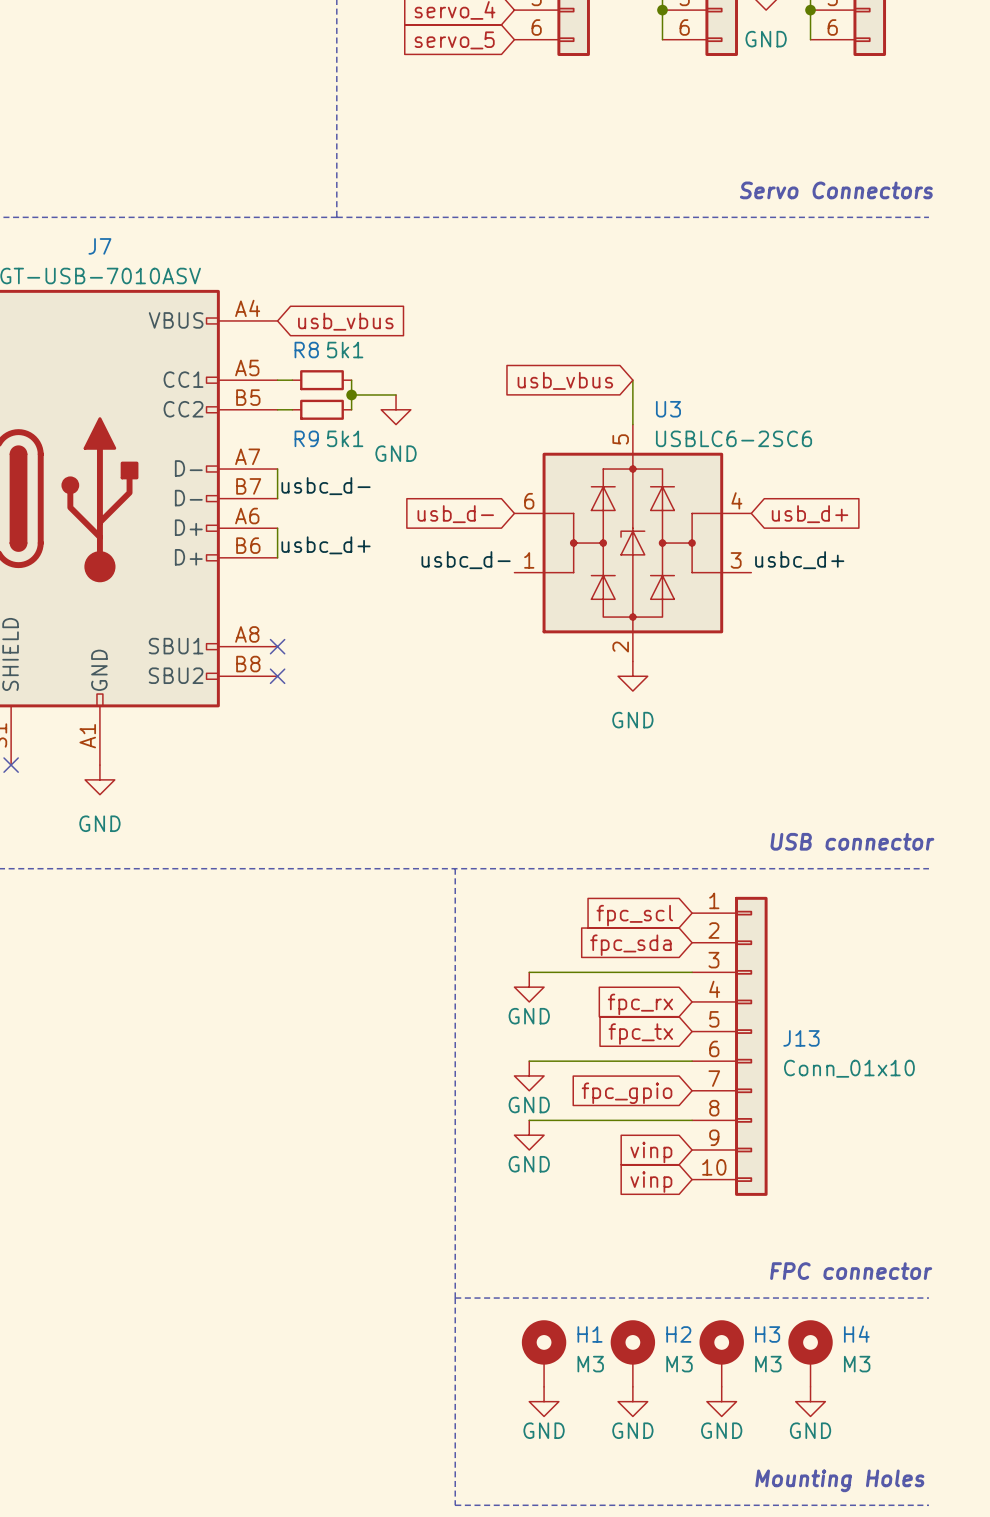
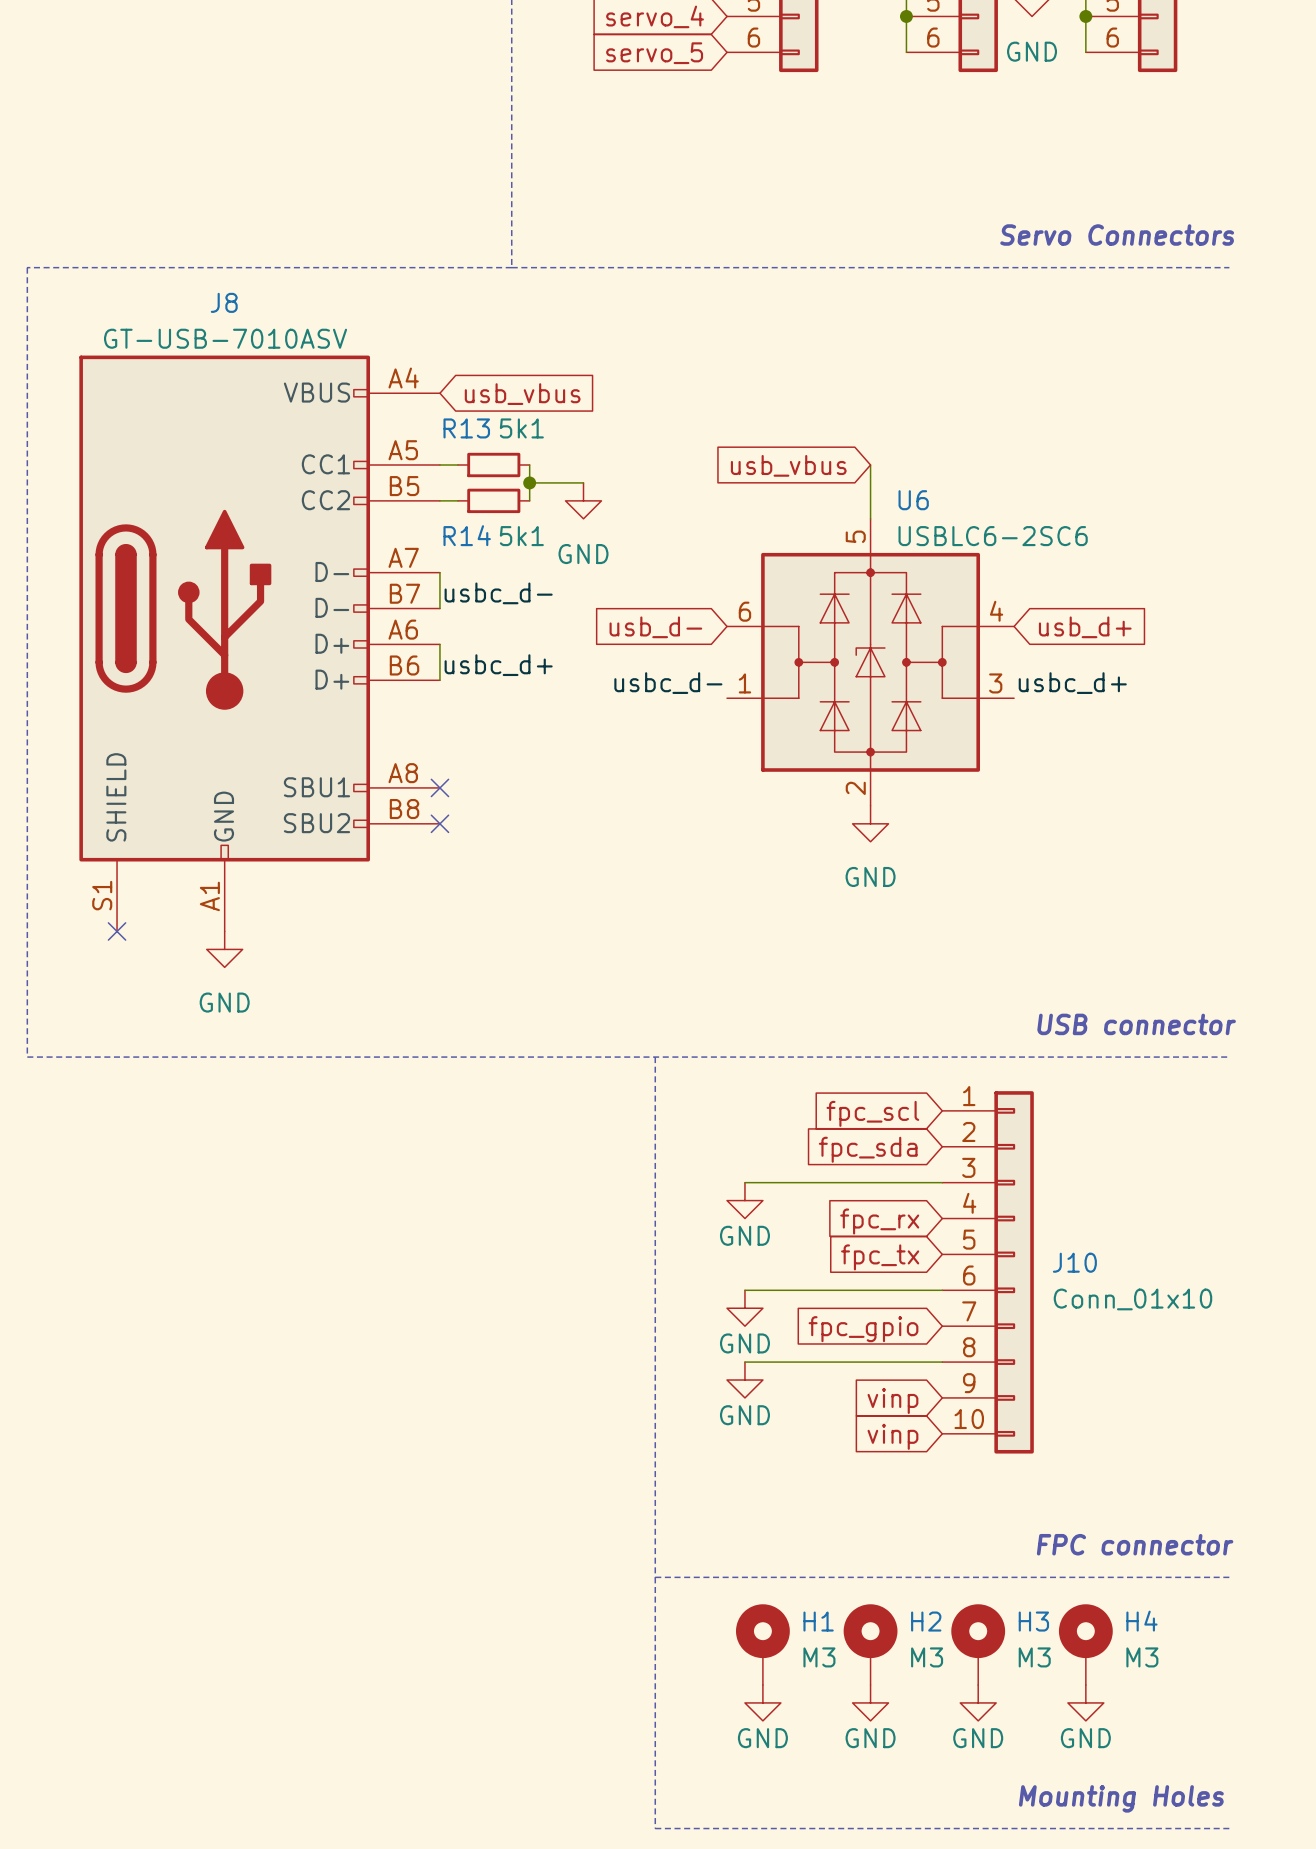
J7 name: J7 (99, 246) -> J8 (224, 302)
R8 name: R8 (306, 350) -> R13 (466, 428)
U3 name: U3 (668, 409) -> U6 (913, 500)
R9 name: R9 (306, 438) -> R14 (467, 535)
J13 name: J13 (801, 1038) -> J10 (1074, 1262)

